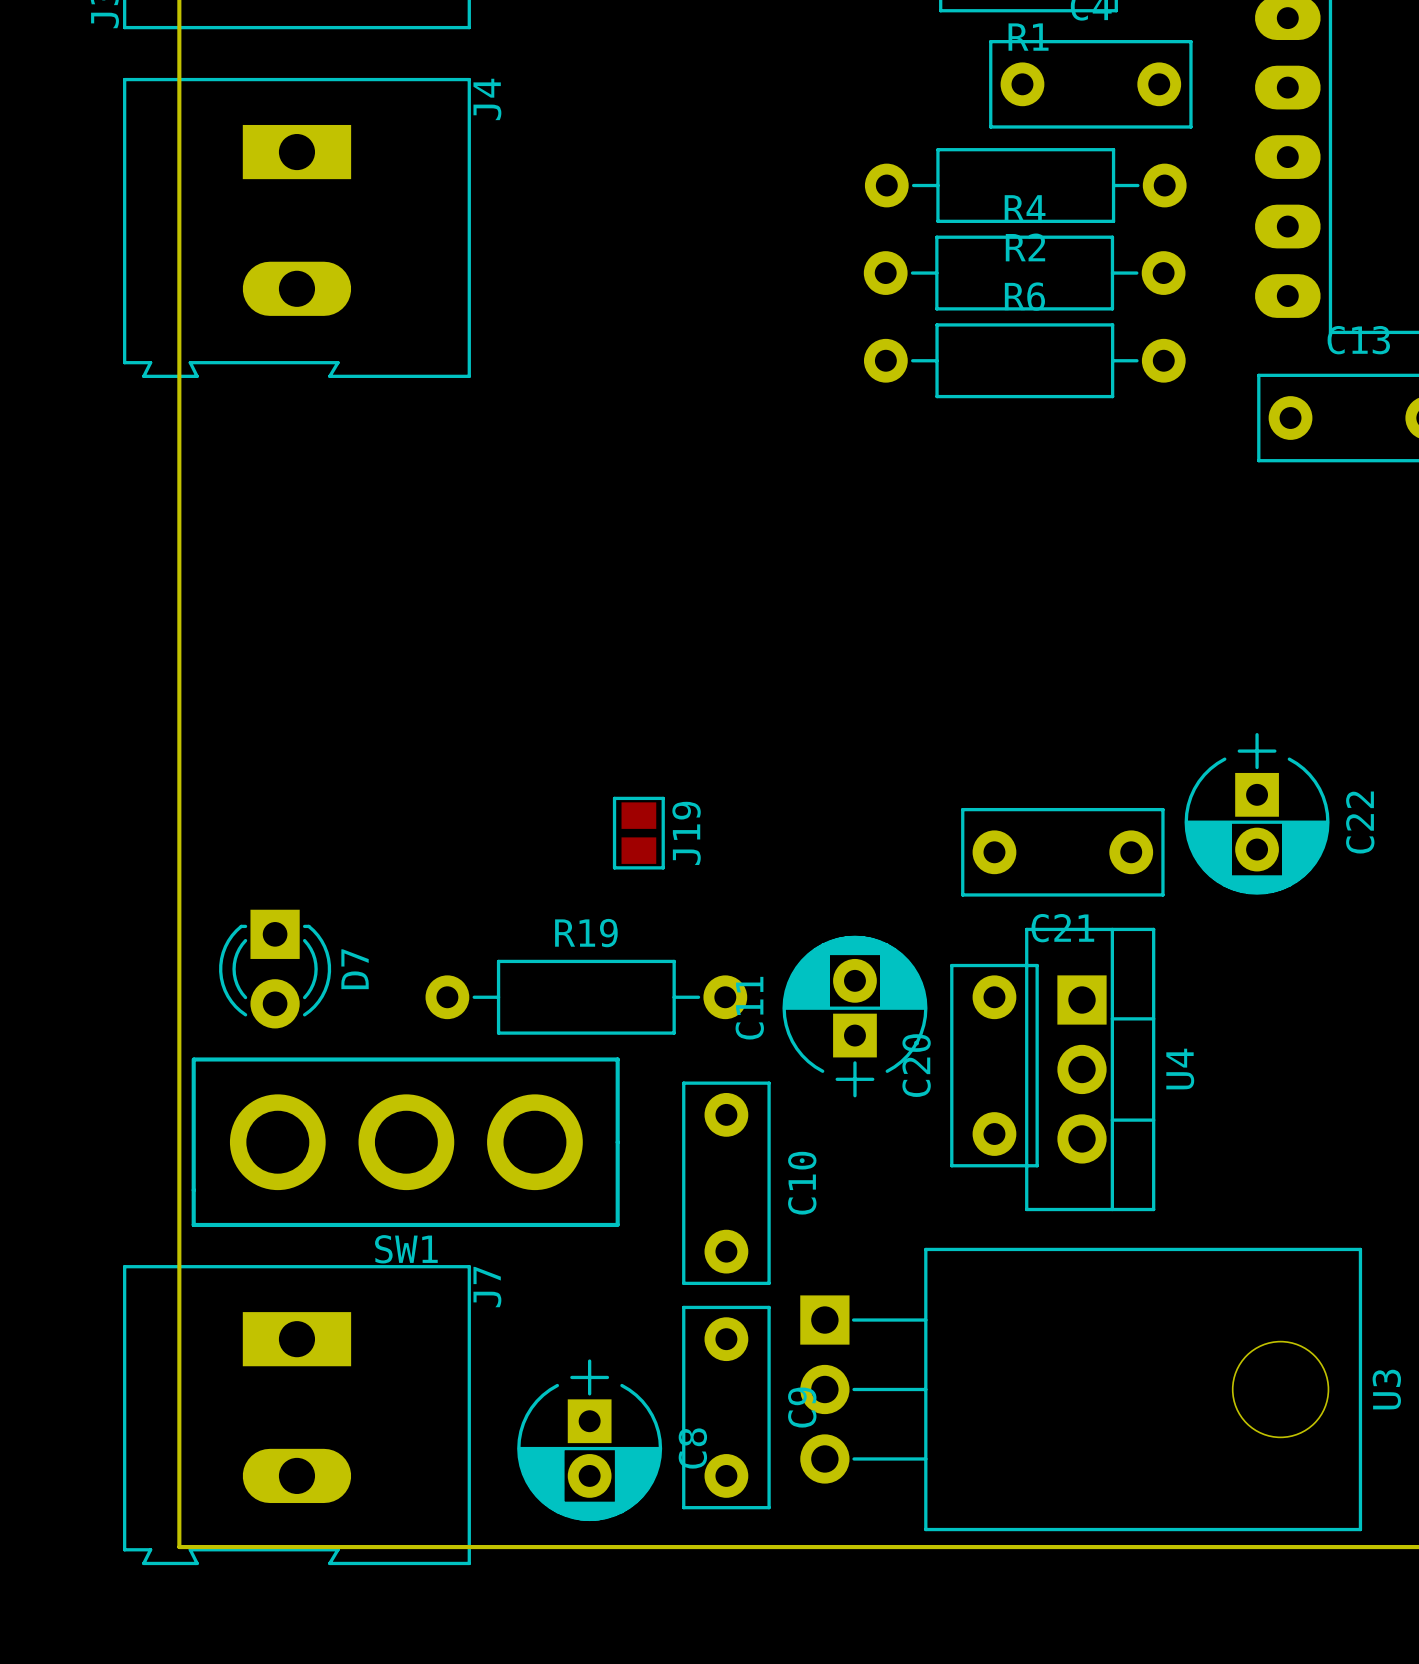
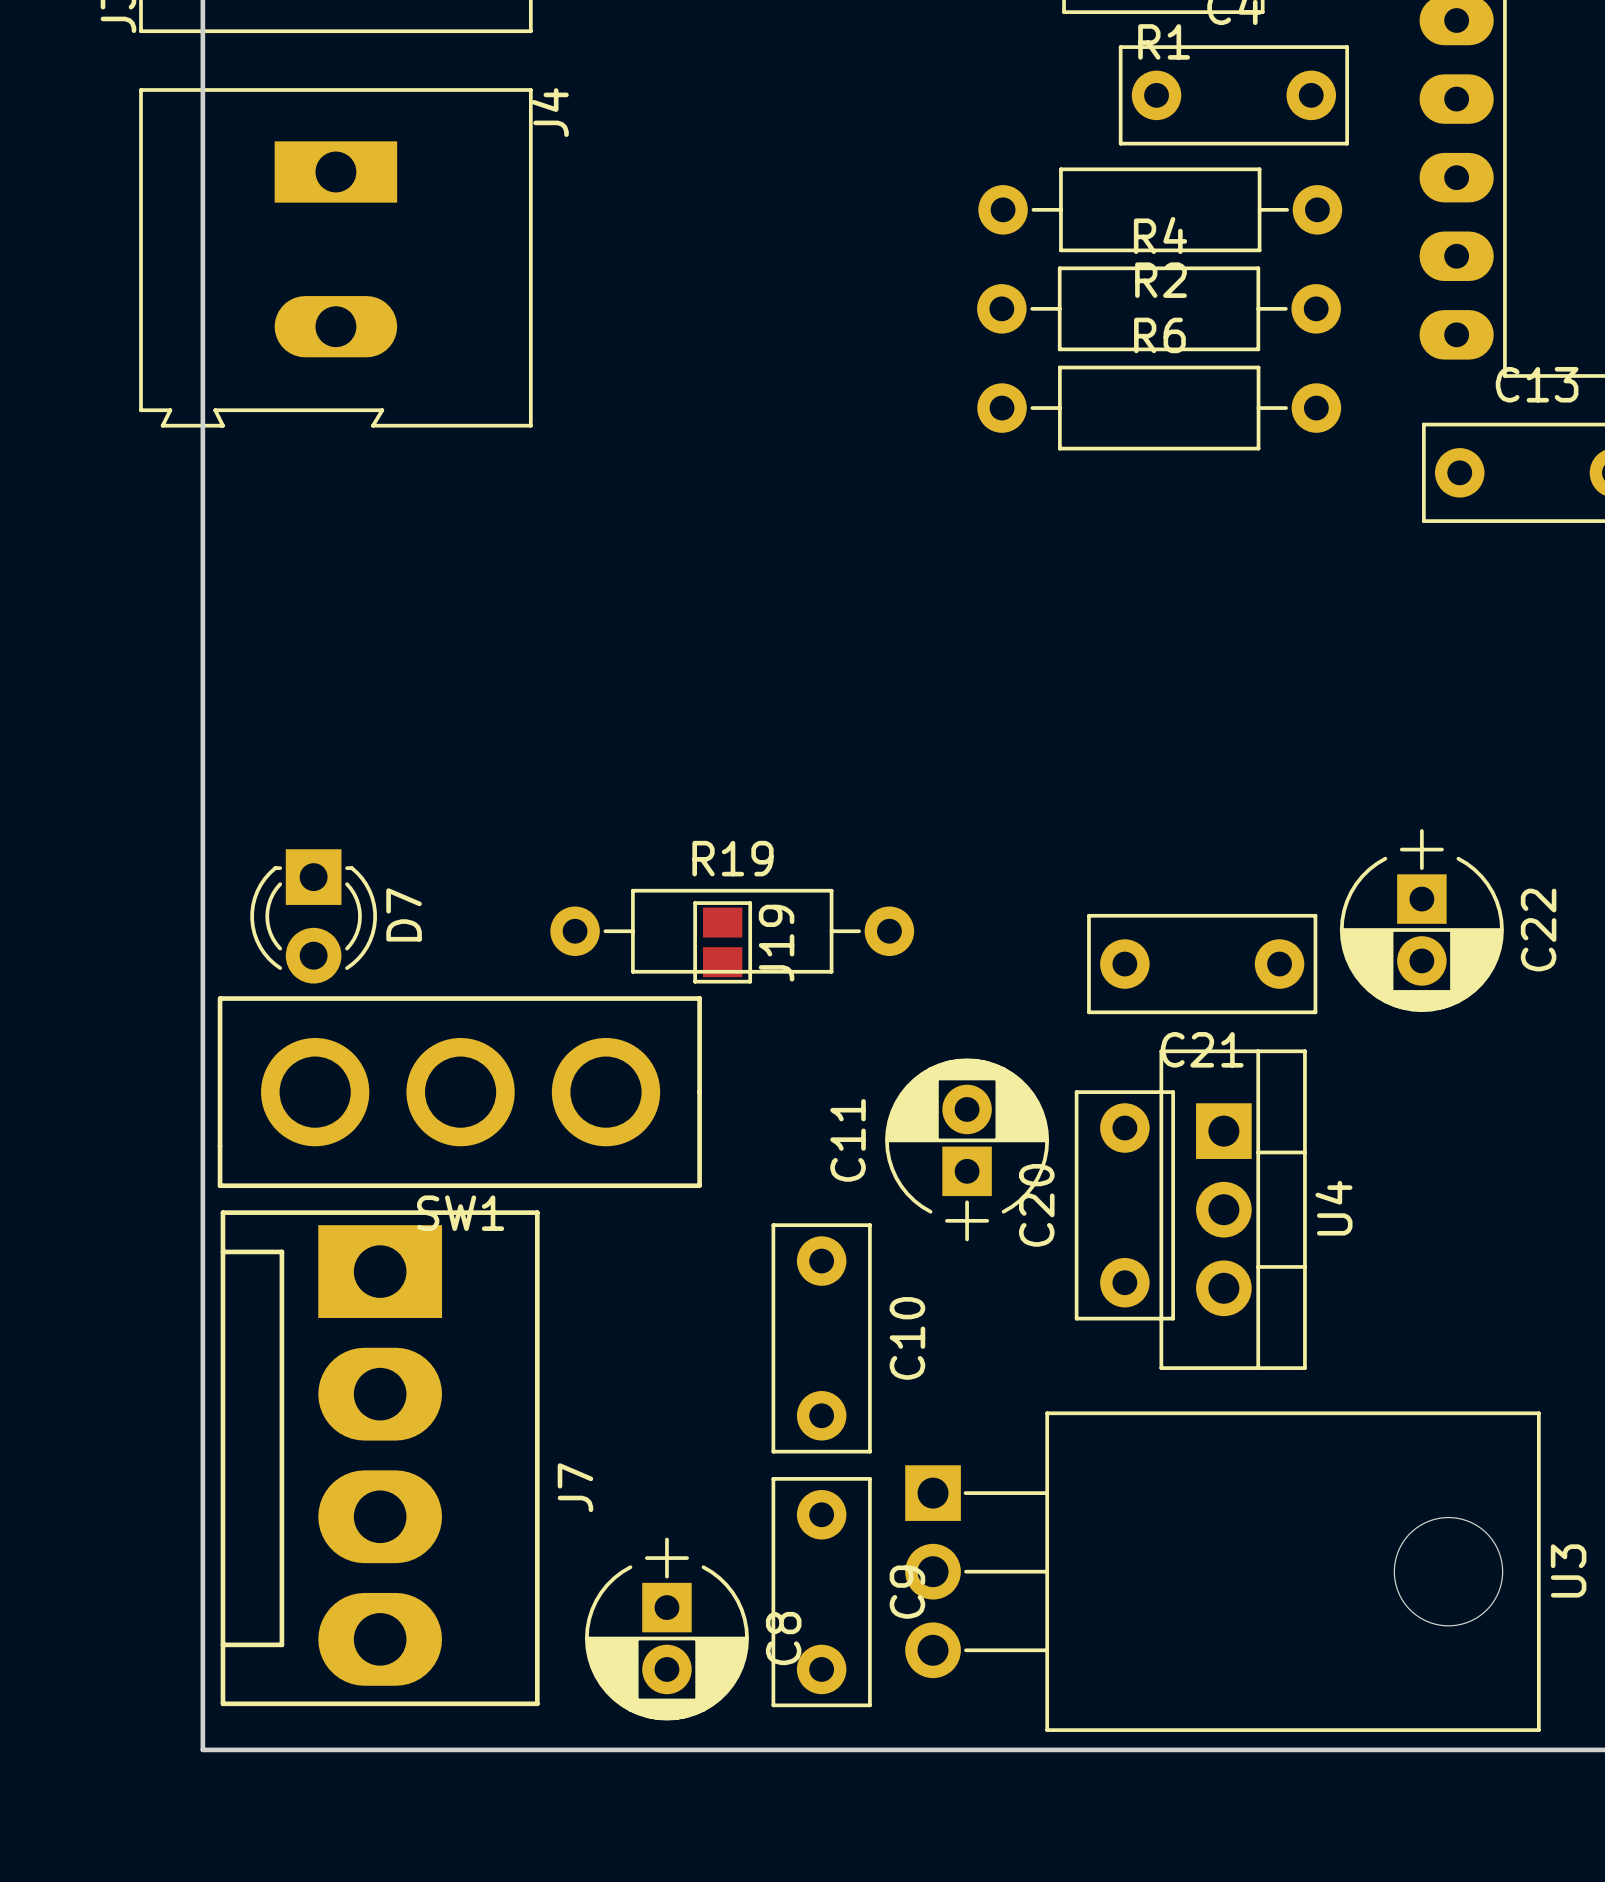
D7 position: (275, 969) -> (313, 916)
R19 position: (586, 997) -> (732, 931)
SW1 position: (405, 1142) -> (459, 1092)
J7 footprint: [123, 1265, 471, 1566] -> [220, 1210, 540, 1707]
J7 name position: J7 (487, 1287) -> J7 (575, 1487)

